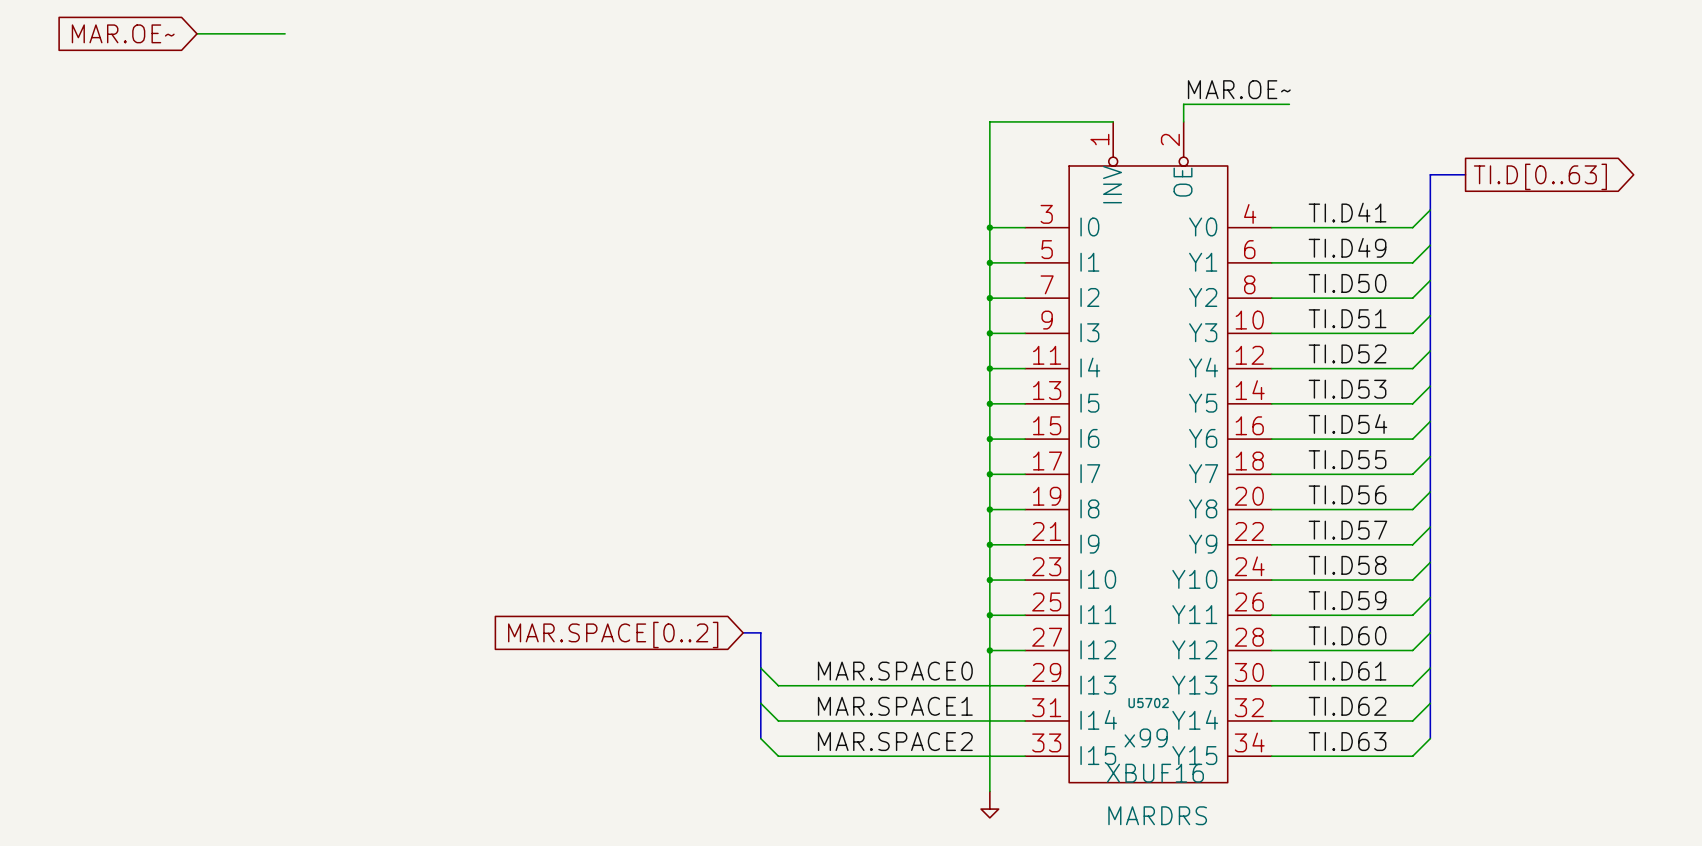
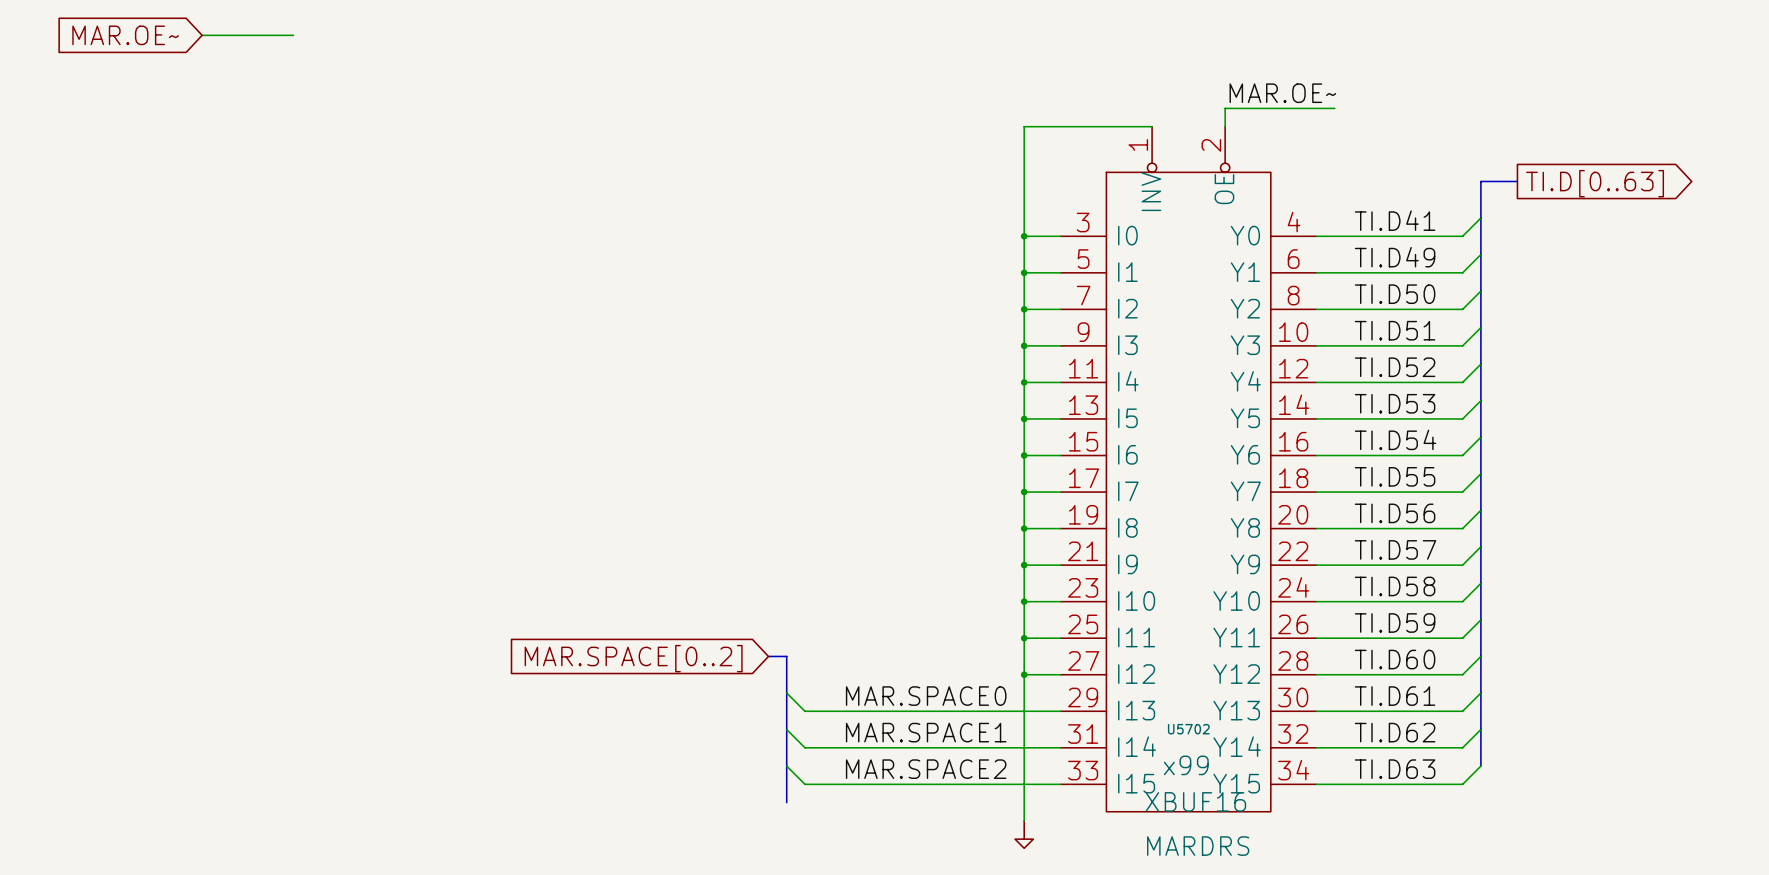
bus: none -> (786, 766) (786, 802)

